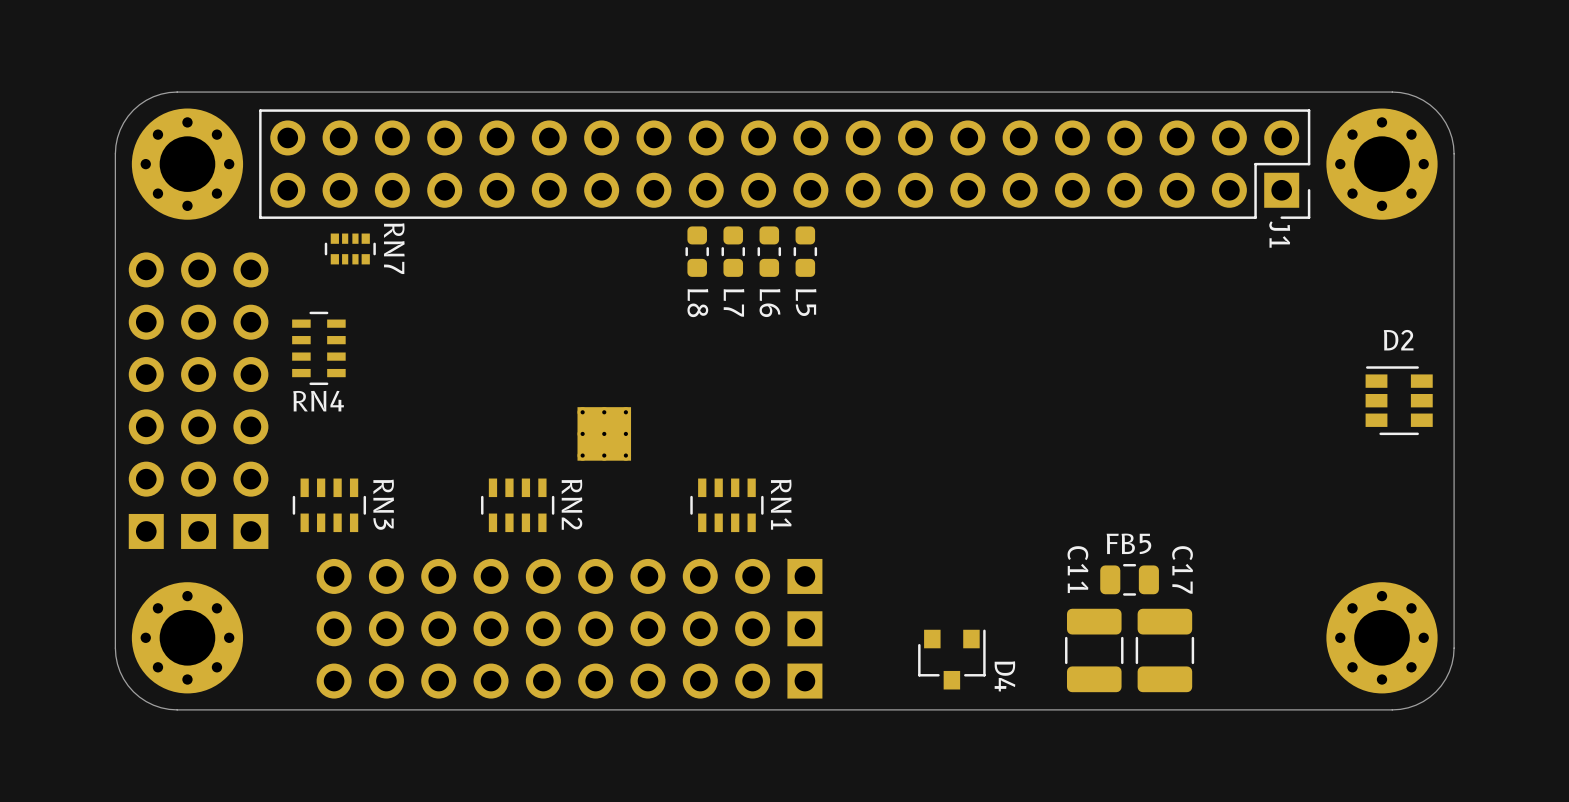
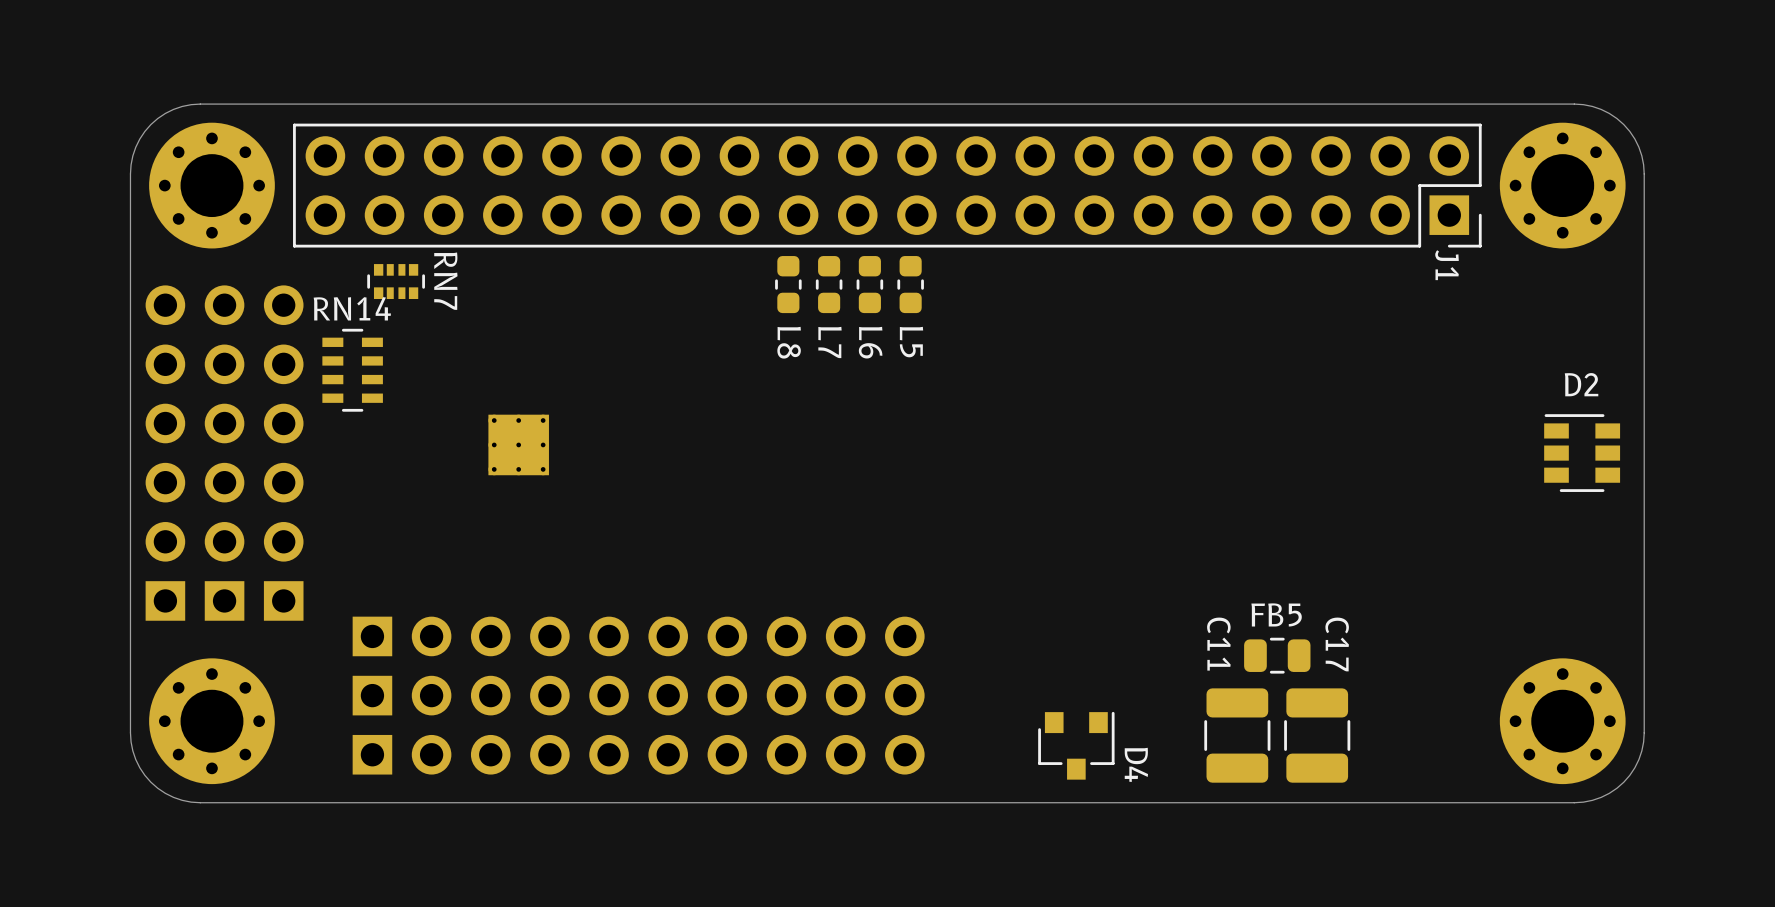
RN14: none -> (352, 370)
RN4: (318, 348) -> none
part position: (604, 433) -> (518, 444)
RN3: (329, 505) -> none
RN2: (517, 505) -> none
RN1: (726, 505) -> none
part rotation: 0° (569, 576) -> 180° (638, 636)
part rotation: 0° (569, 628) -> 180° (638, 695)
part rotation: 0° (569, 681) -> 180° (638, 754)

